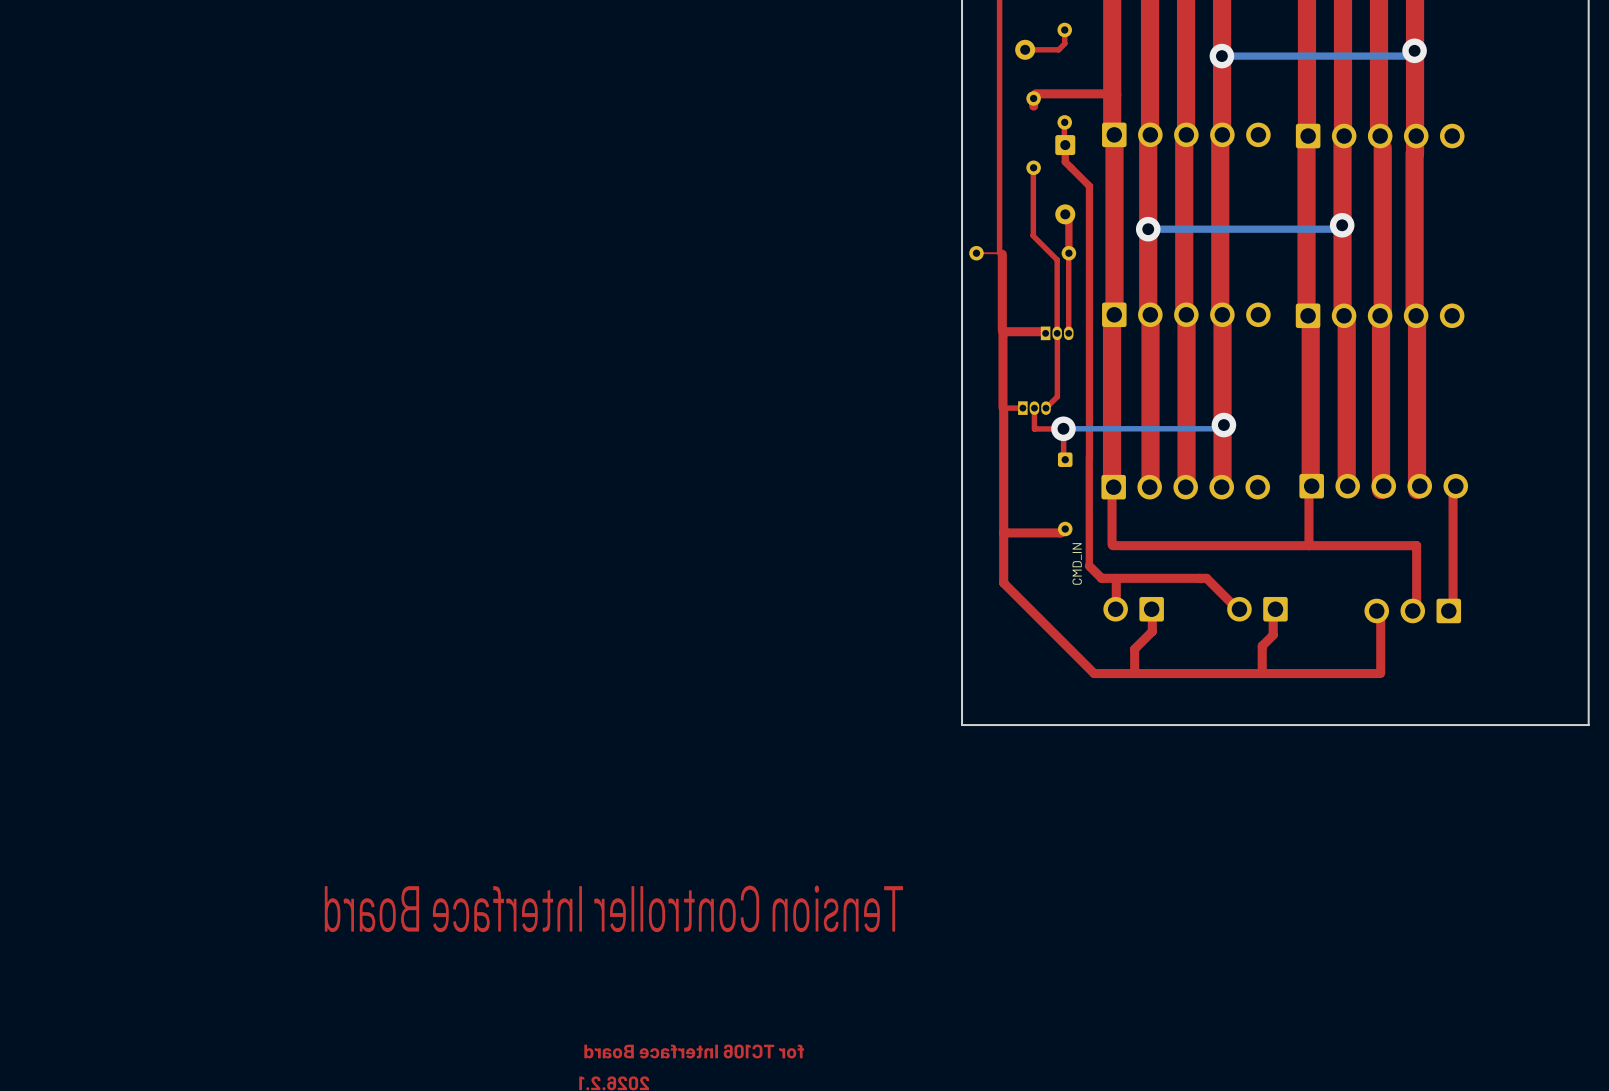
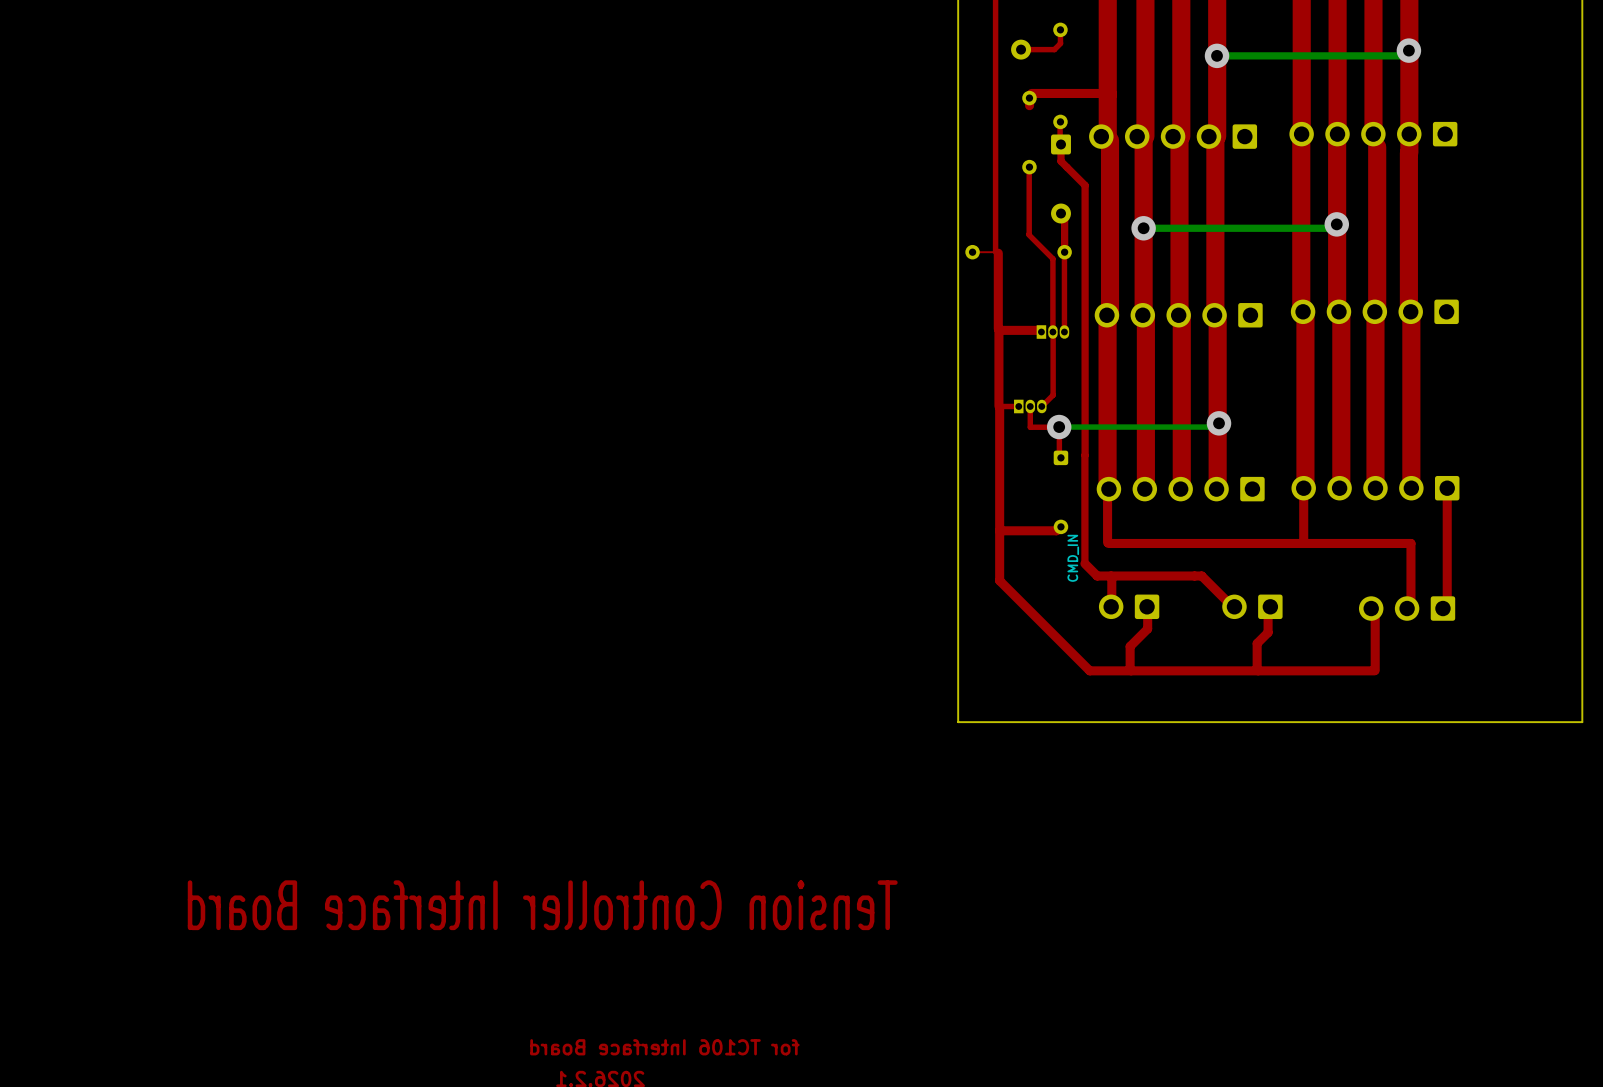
part rotation: 0° (1186, 134) -> 180° (1173, 136)
part rotation: 0° (1380, 136) -> 180° (1373, 134)
part rotation: 0° (1186, 314) -> 180° (1178, 315)
part rotation: 0° (1380, 315) -> 180° (1374, 311)
part rotation: 0° (1383, 486) -> 180° (1375, 488)
part rotation: 0° (1185, 487) -> 180° (1180, 489)

